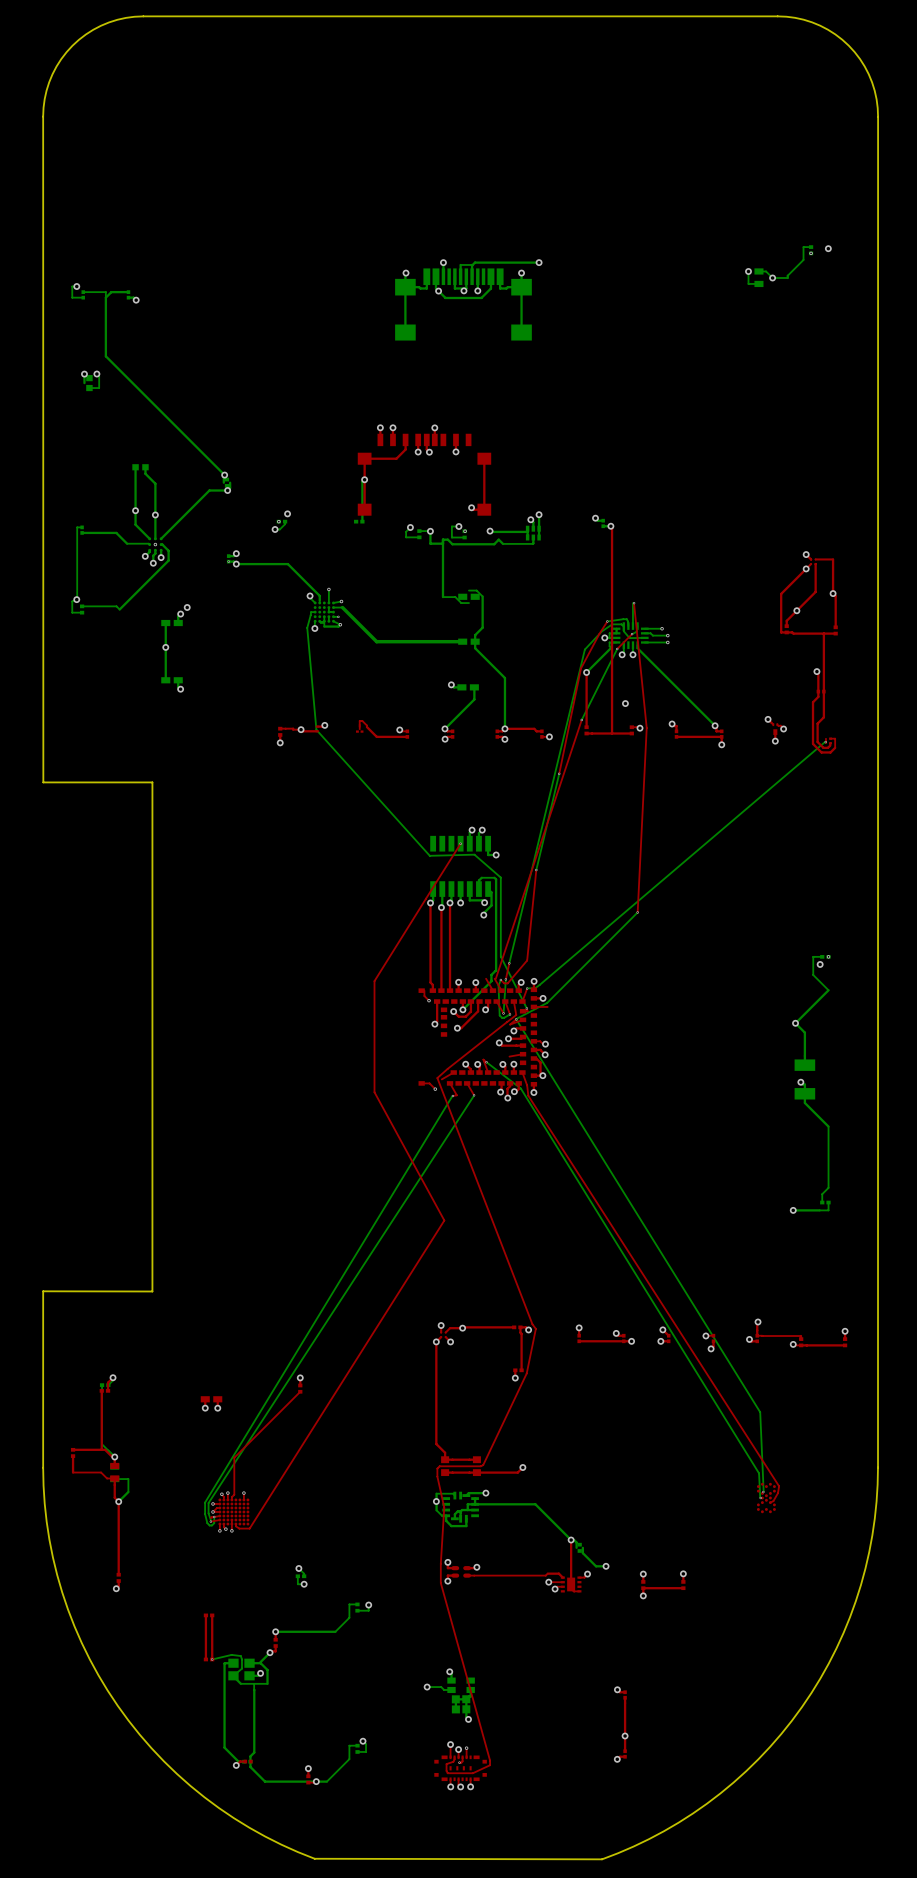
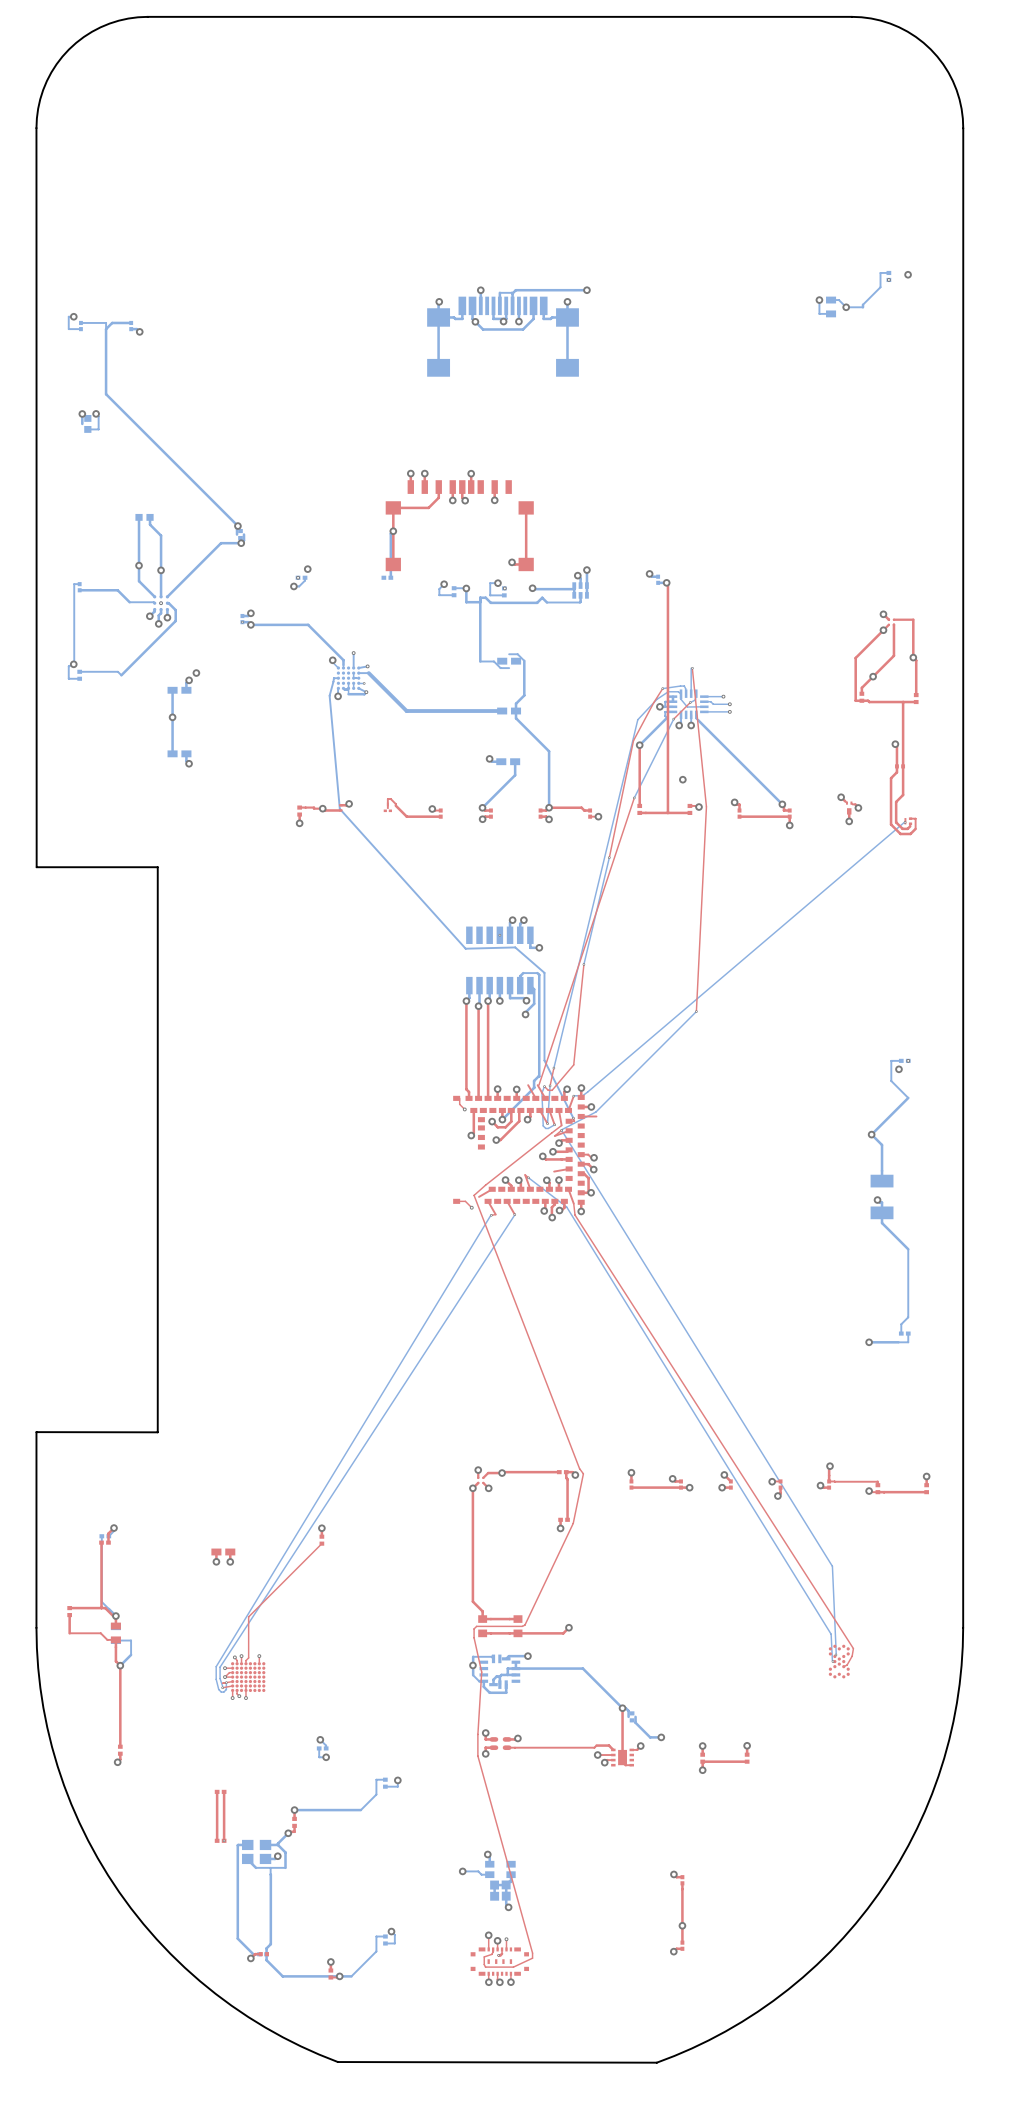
top track: (460, 843) (374, 981) (374, 1092) (444, 1220) (249, 1528) (239, 1528) (235, 1524) -> none
bottom track: (212, 1659) (231, 1654) (240, 1656) (241, 1668) (233, 1675) -> none

